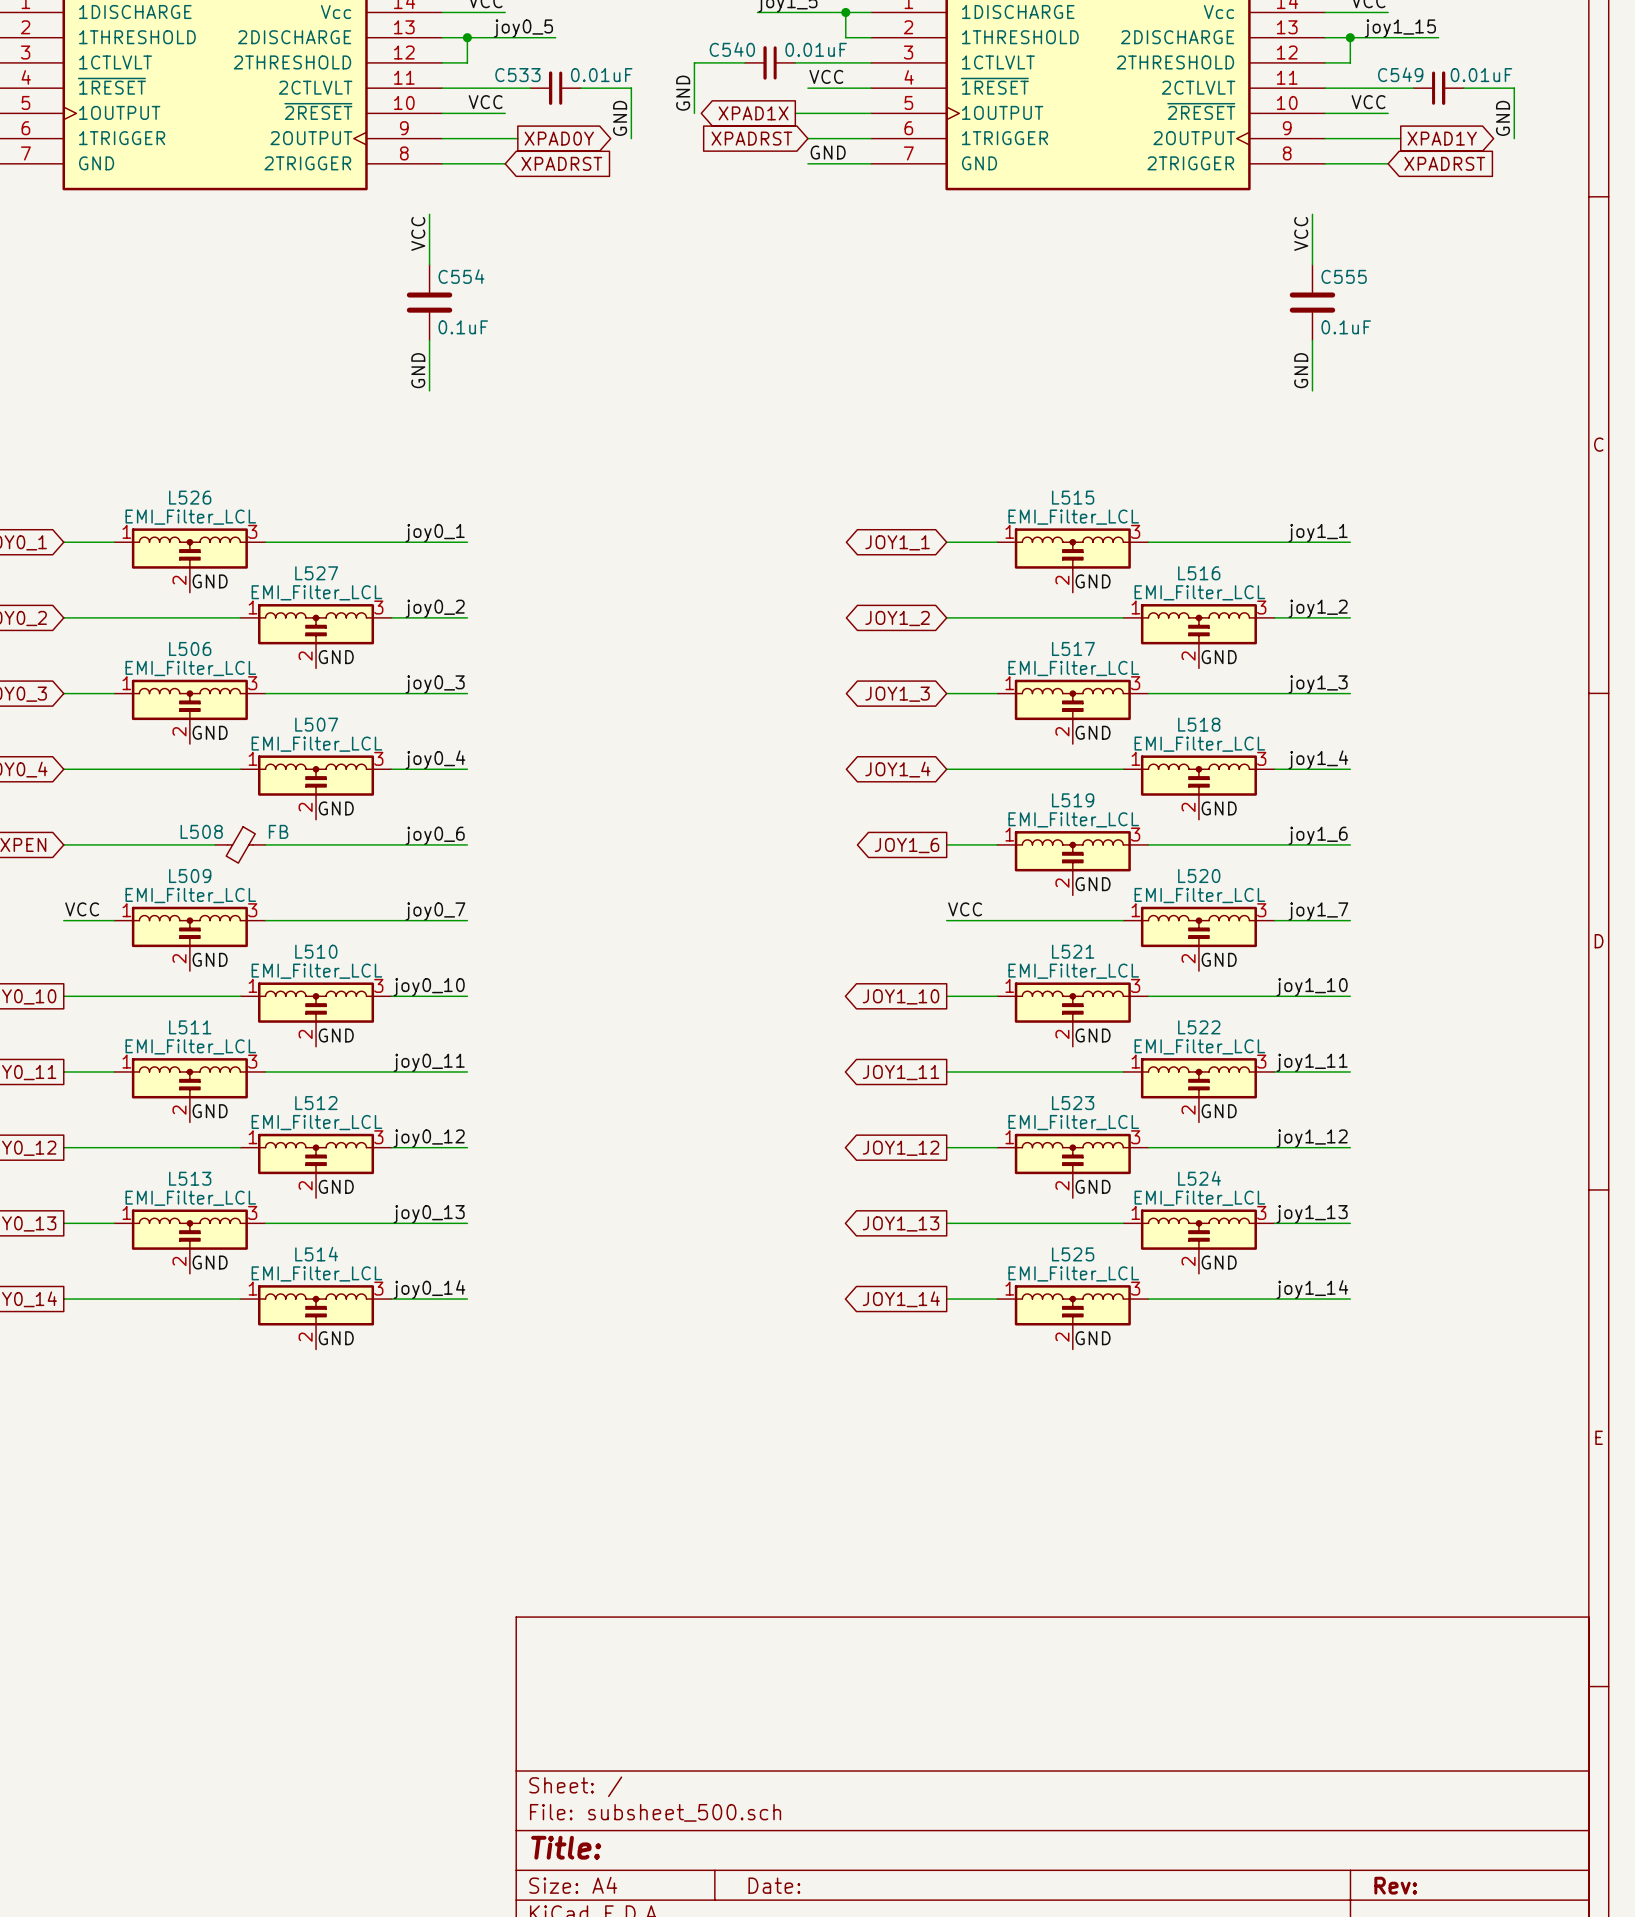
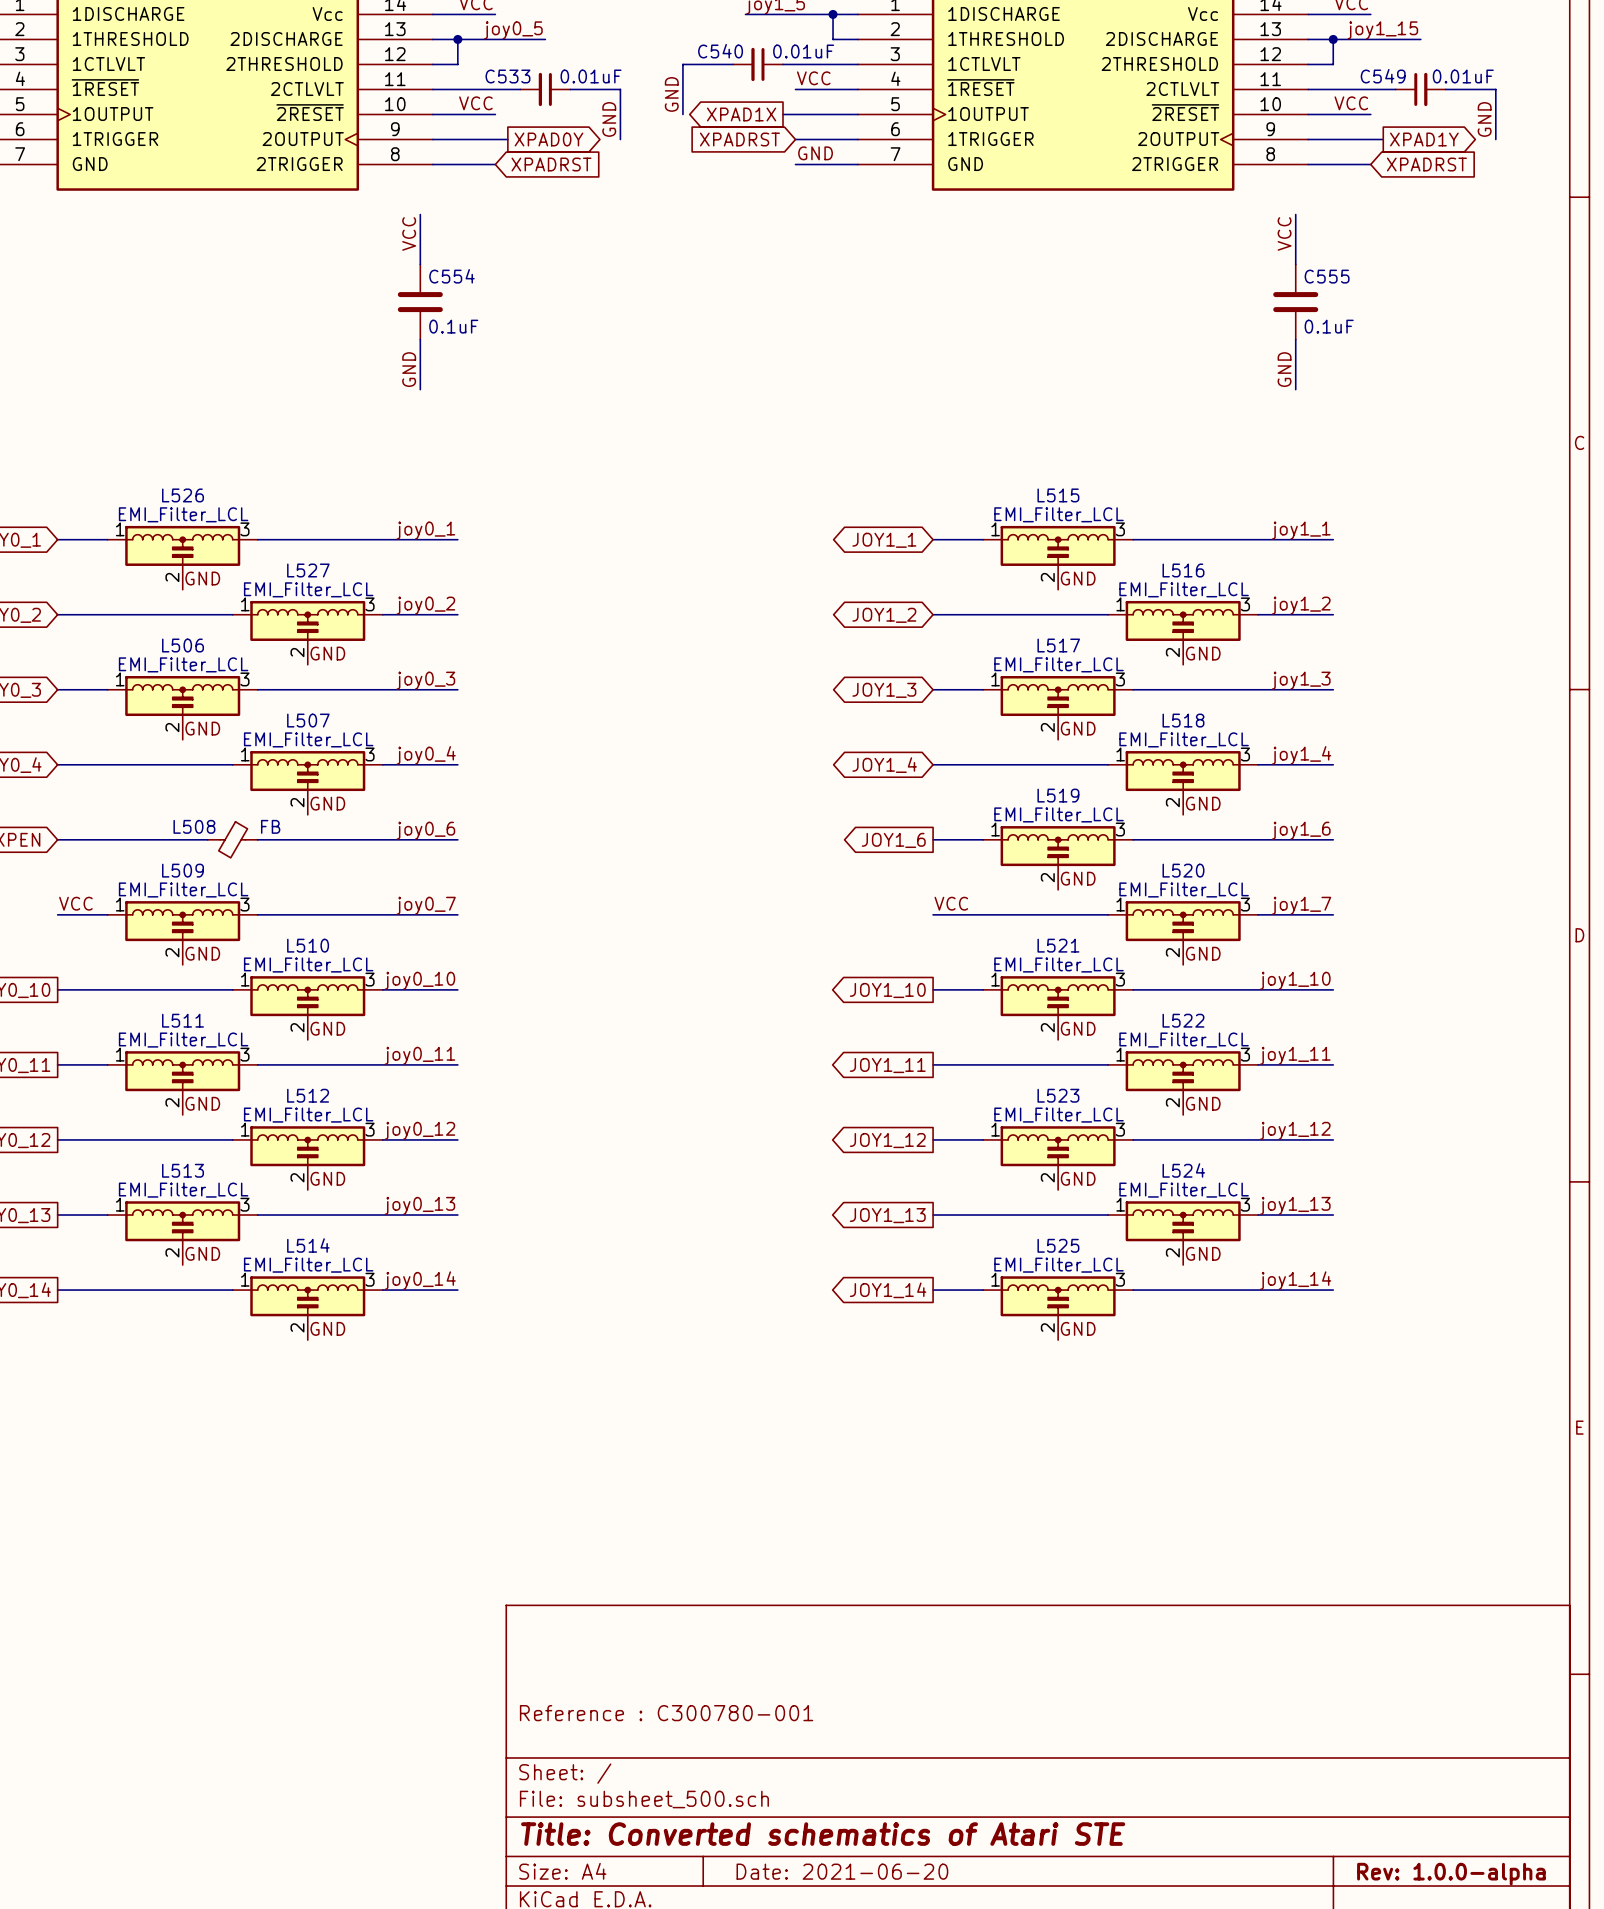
title block: none -> Reference : C300780-001 (666, 1713)
title block: Title: (566, 1847) -> Title: Converted schematics of Atari STE (823, 1834)
title block: Date: (774, 1885) -> Date: 2021-06-20 (842, 1871)
title block: Rev: (1395, 1885) -> Rev: 1.0.0-alpha (1451, 1874)

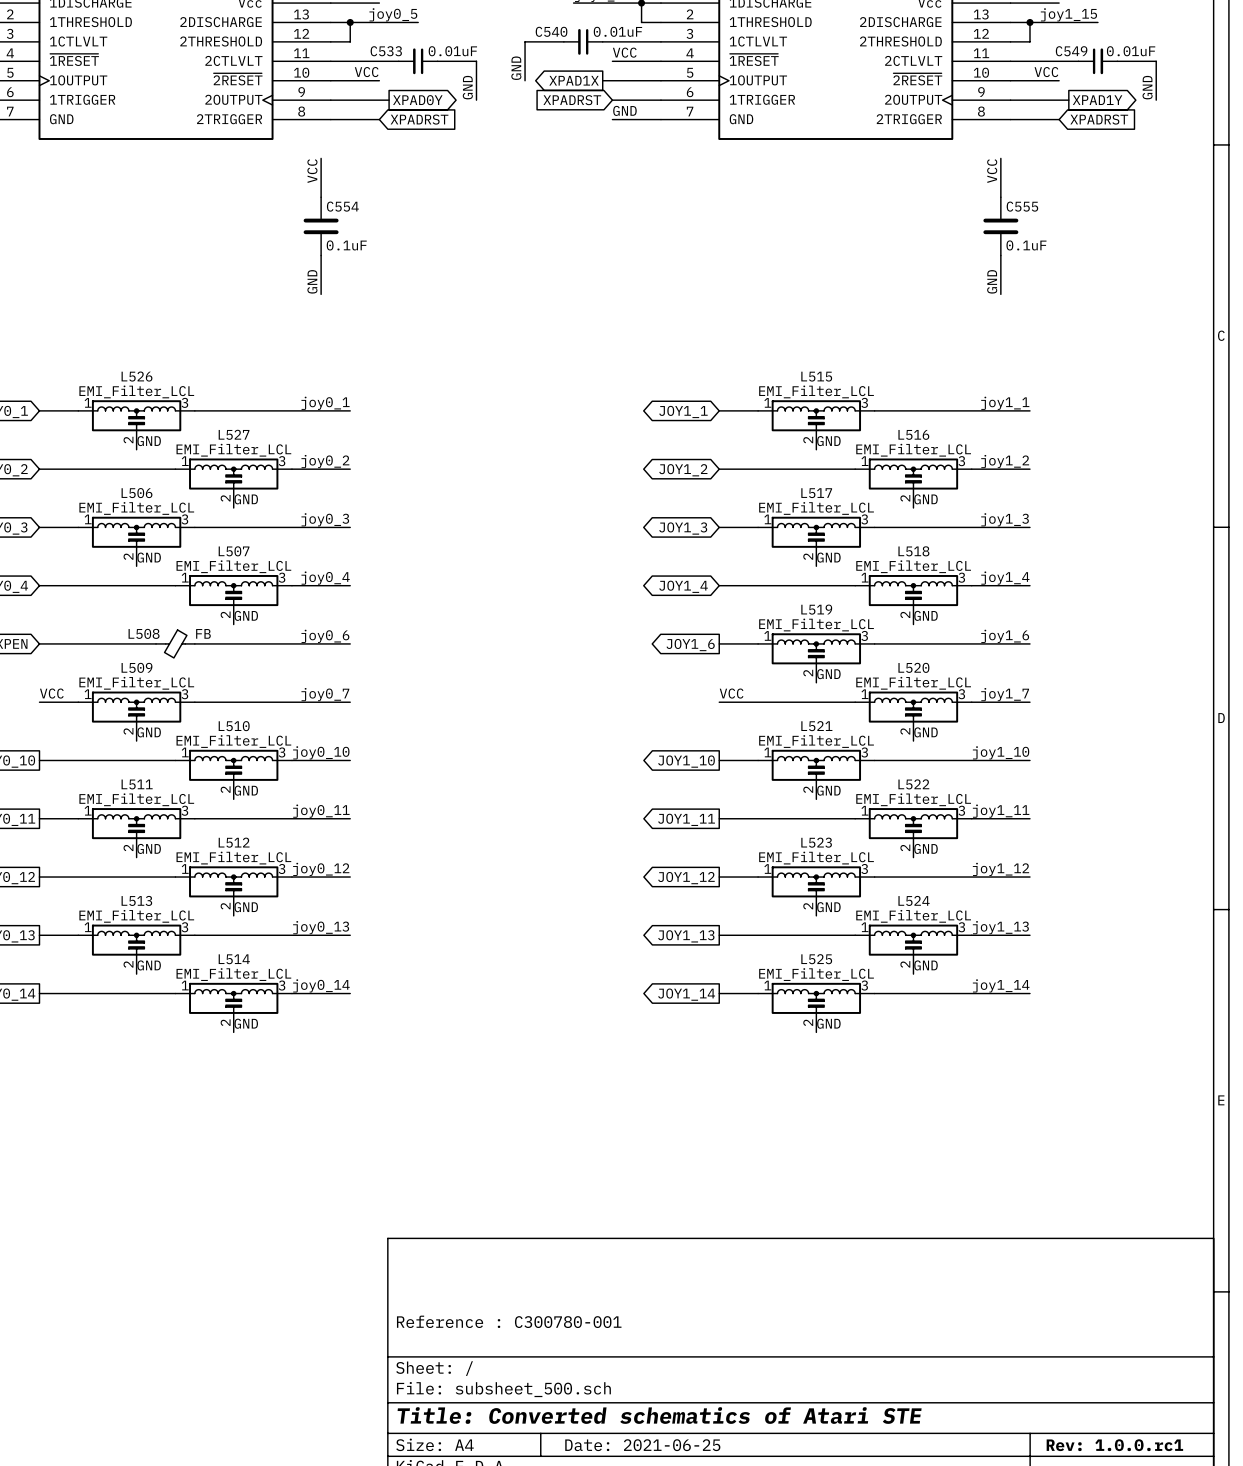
title block: Date: 2021-06-20 (842, 1871) -> Date: 2021-06-25 (642, 1445)
title block: Rev: 1.0.0-alpha (1451, 1874) -> Rev: 1.0.0.rc1 (1114, 1445)

